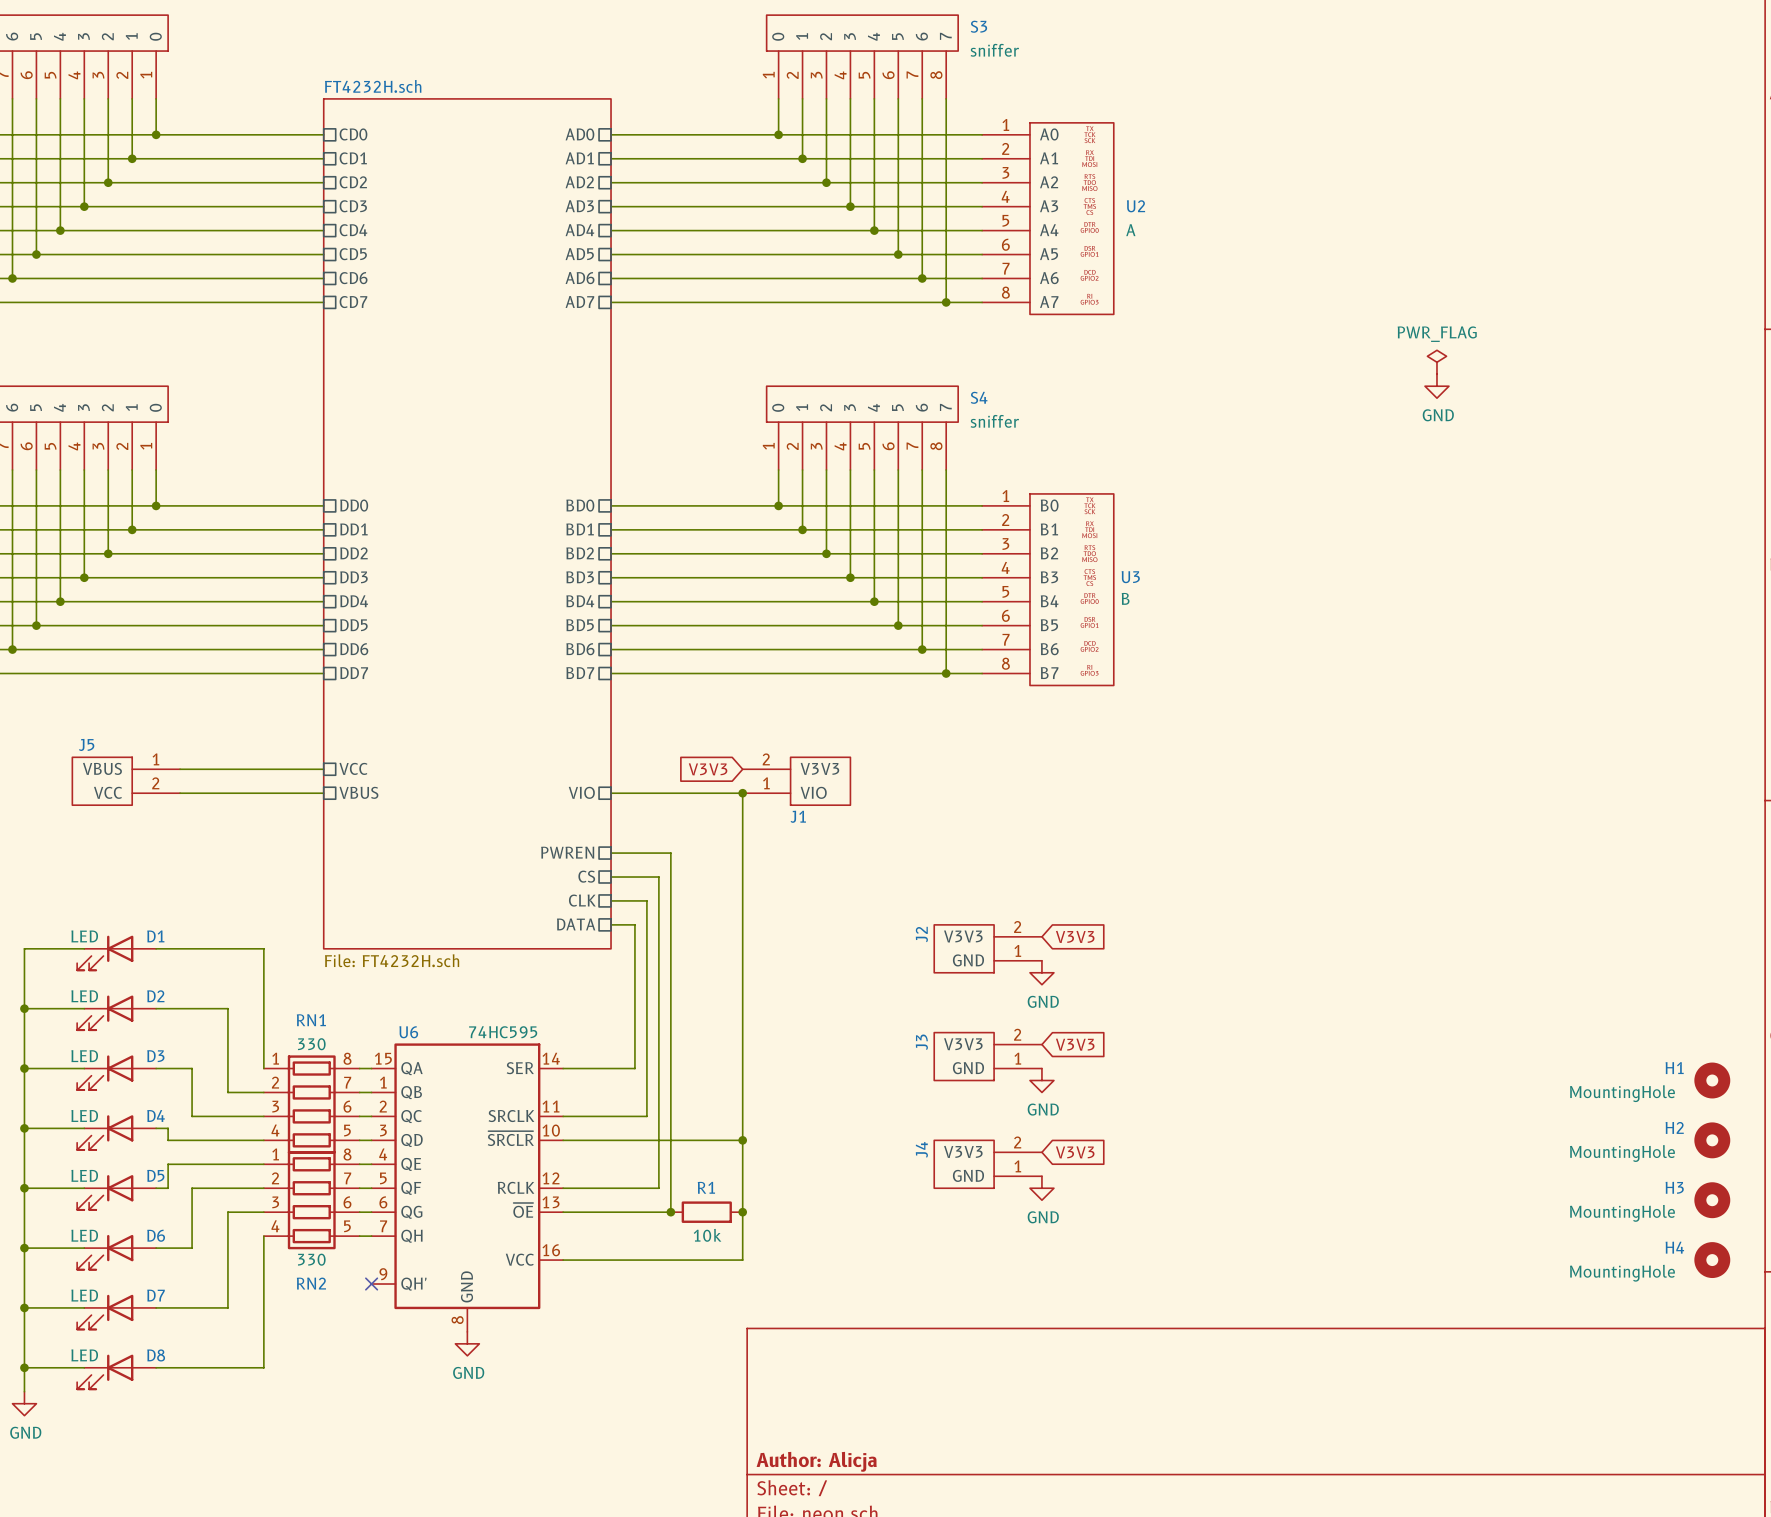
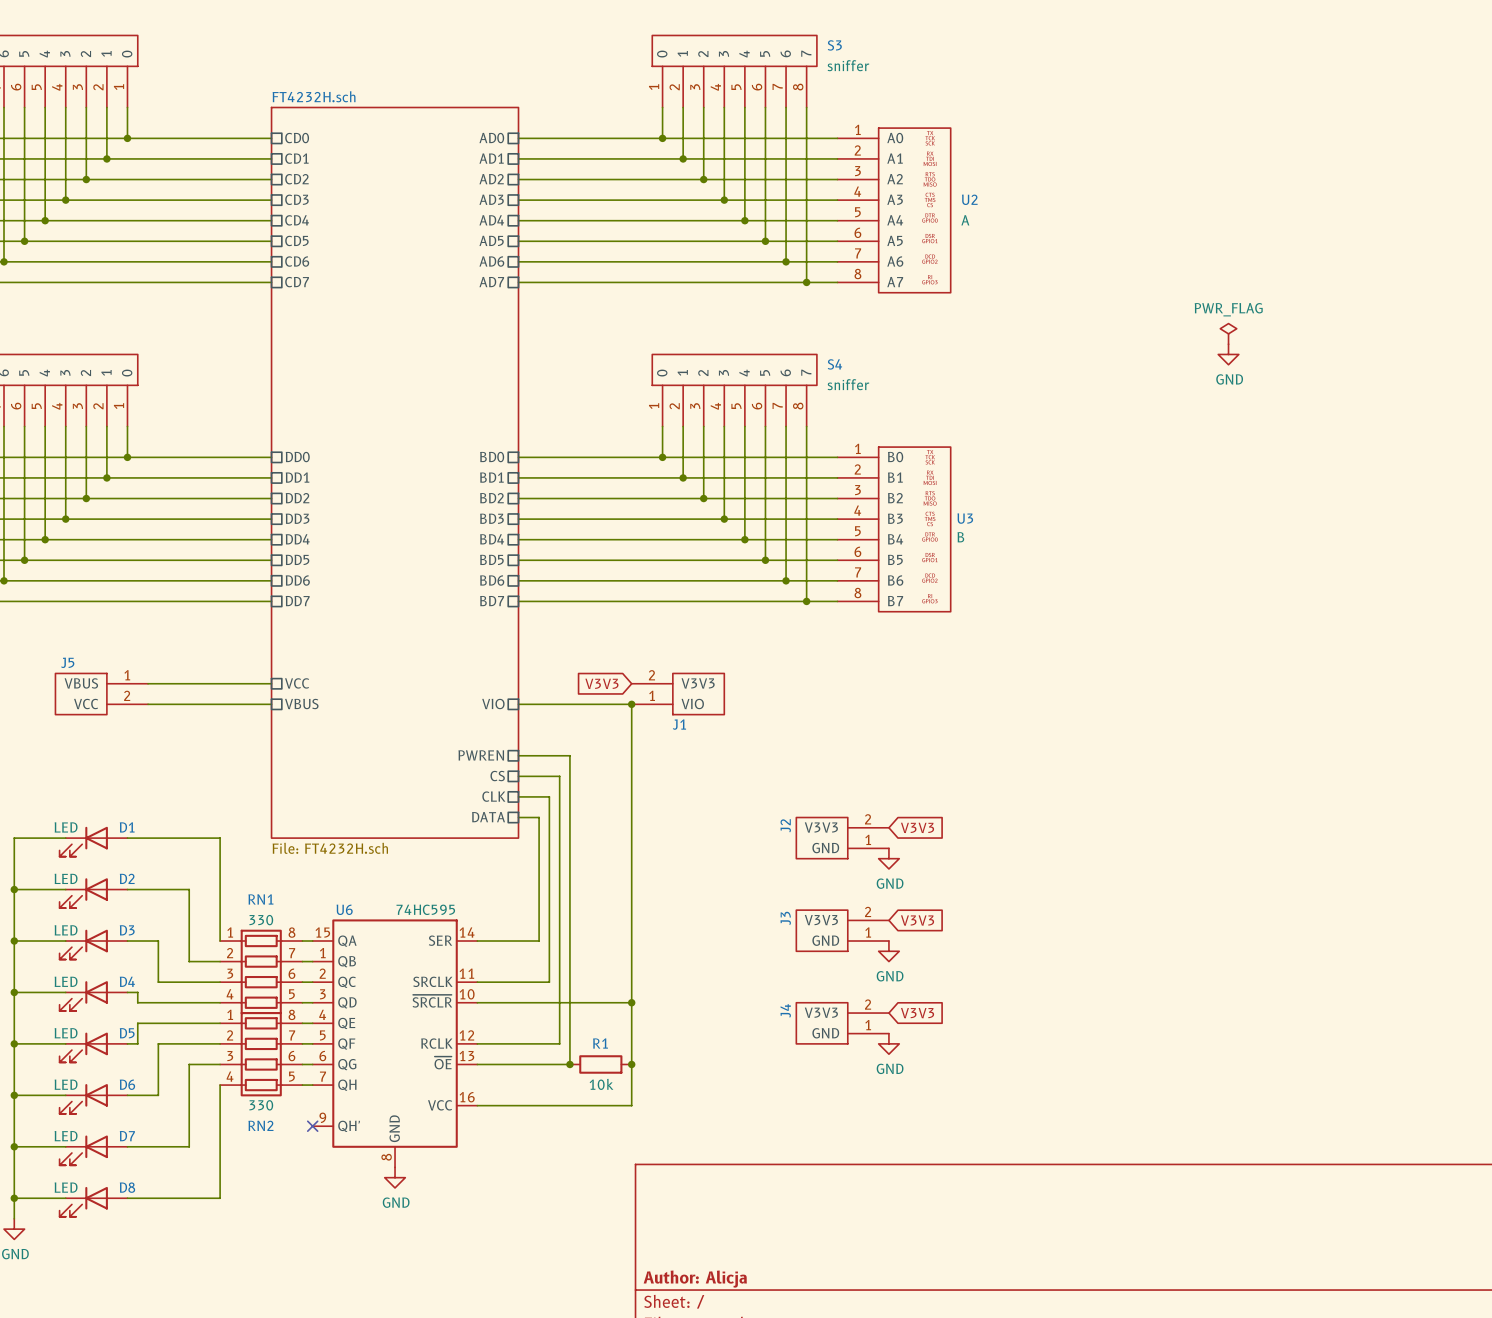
H1: MountingHole (1712, 1080) -> none
H2: MountingHole (1712, 1140) -> none
H3: MountingHole (1712, 1200) -> none
H4: MountingHole (1712, 1260) -> none

